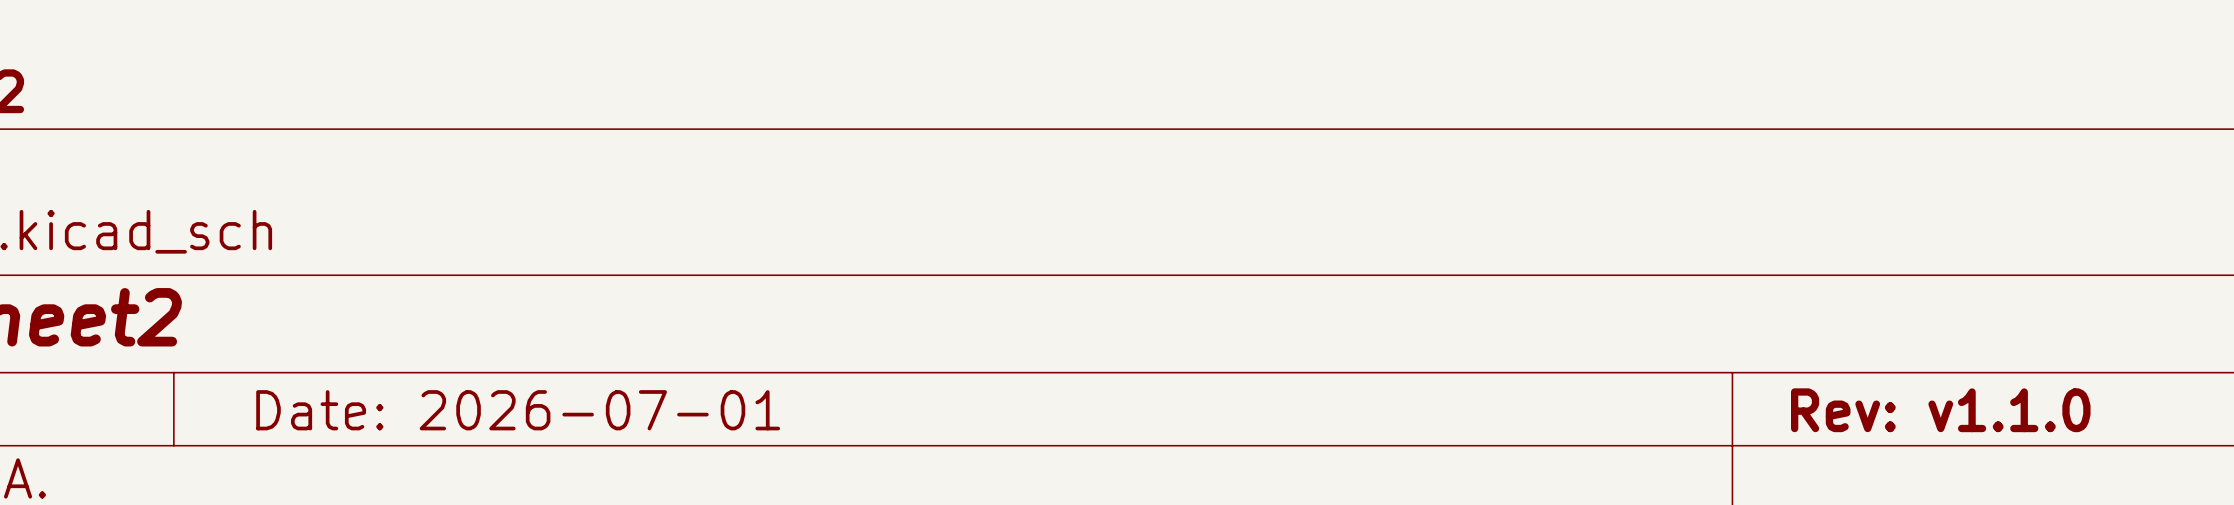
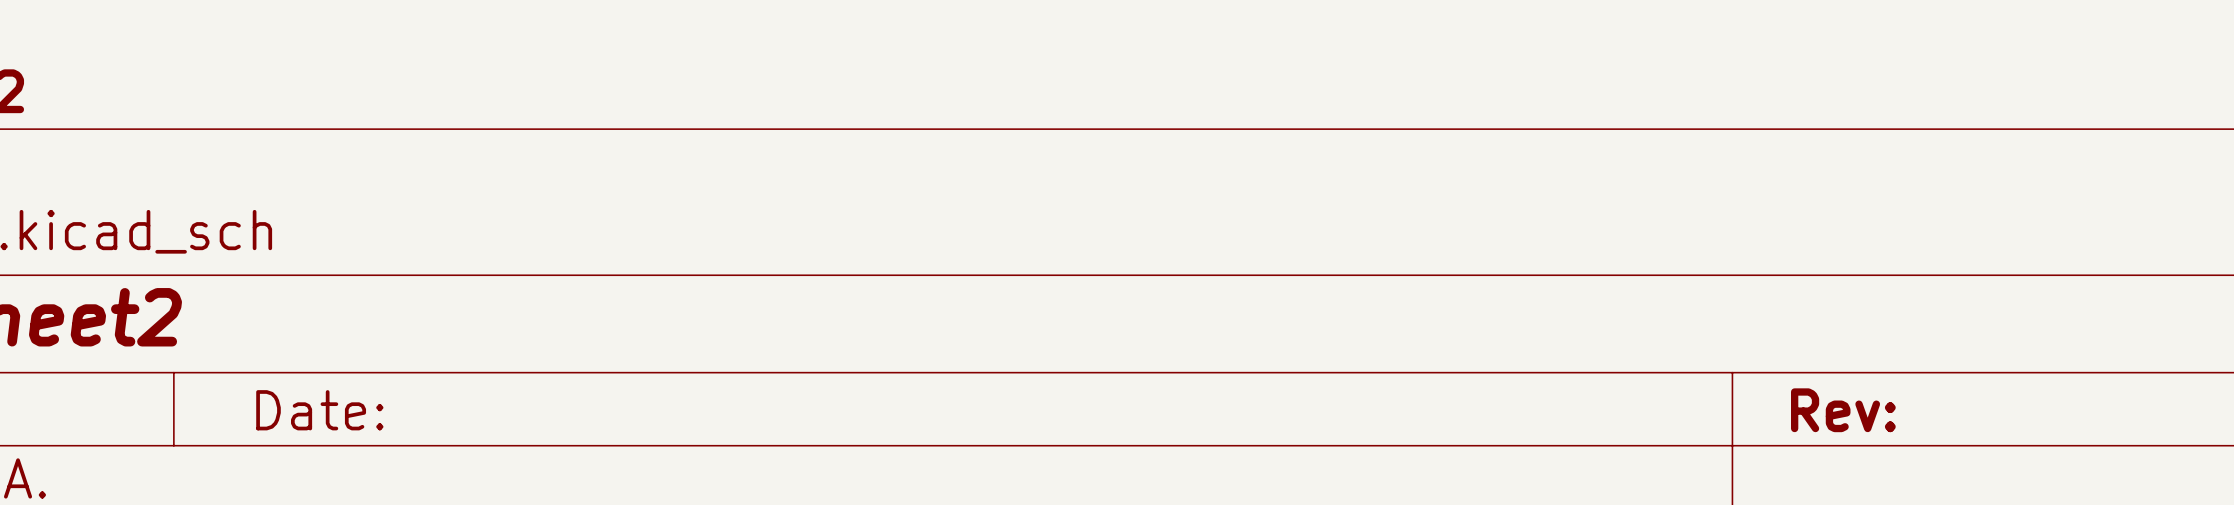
title block: Date: 2026-07-01 (518, 410) -> Date: (319, 410)
title block: Rev: v1.1.0 (1940, 410) -> Rev: (1843, 410)

